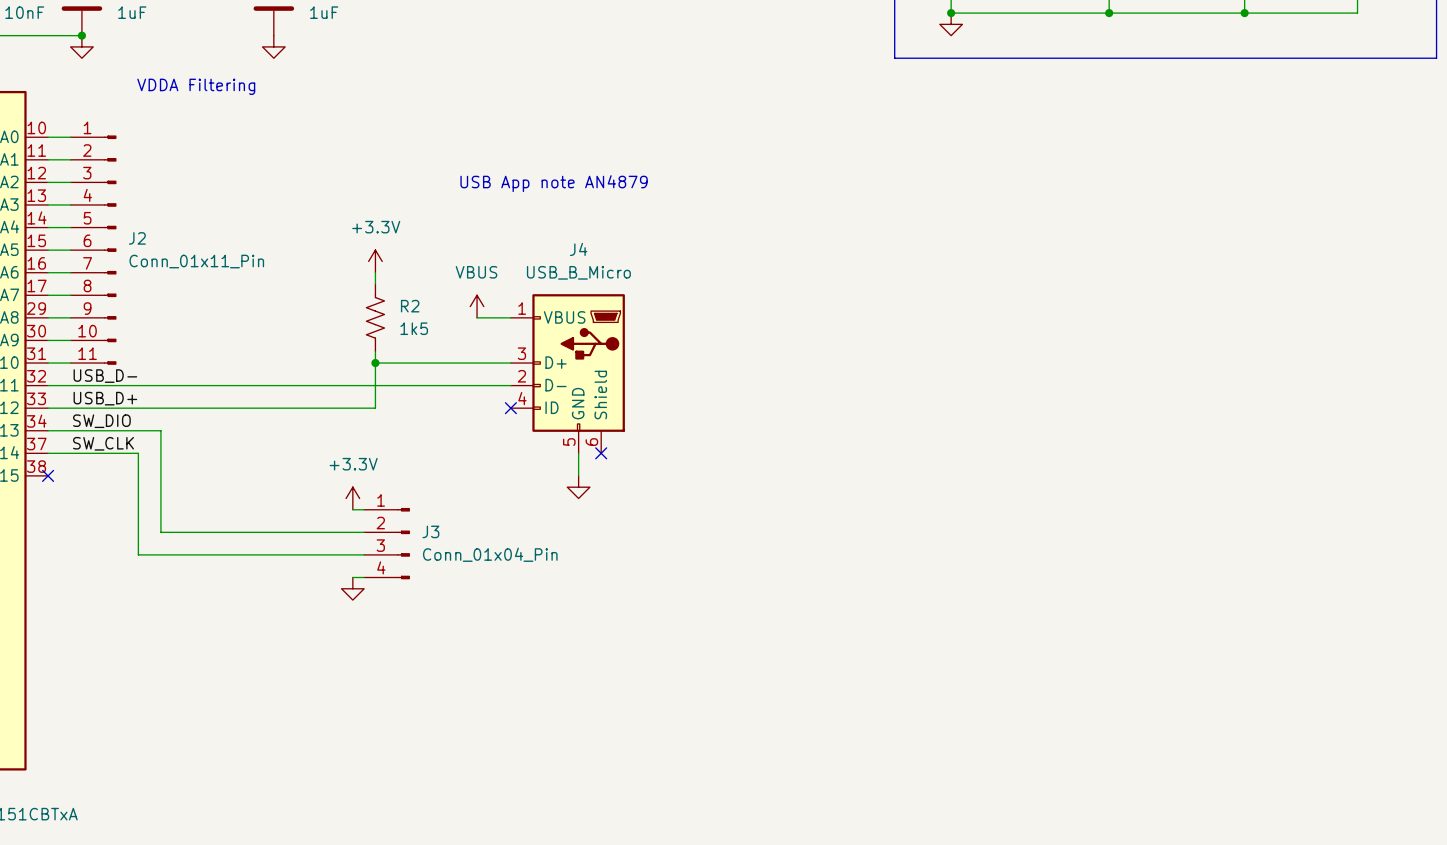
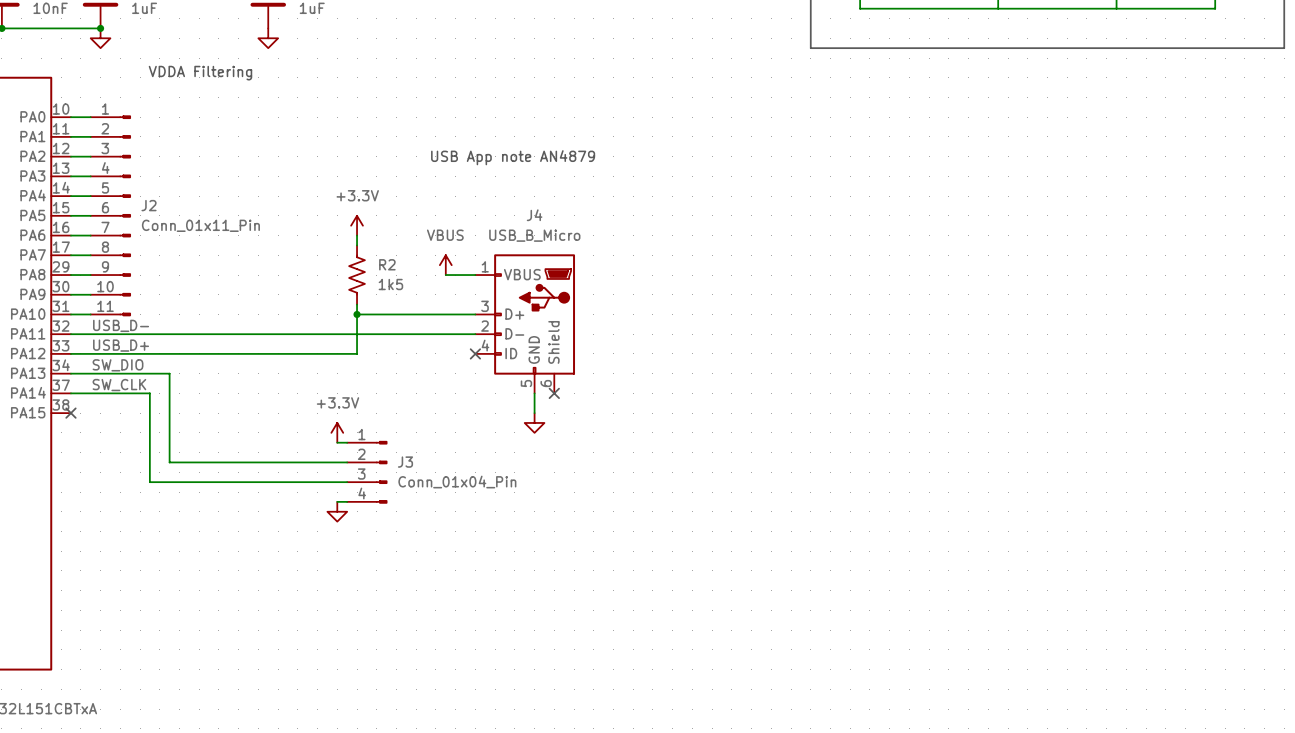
junction: (951, 13) -> none
junction: (1109, 13) -> none
junction: (1244, 13) -> none
power symbol: (951, 24) -> none

